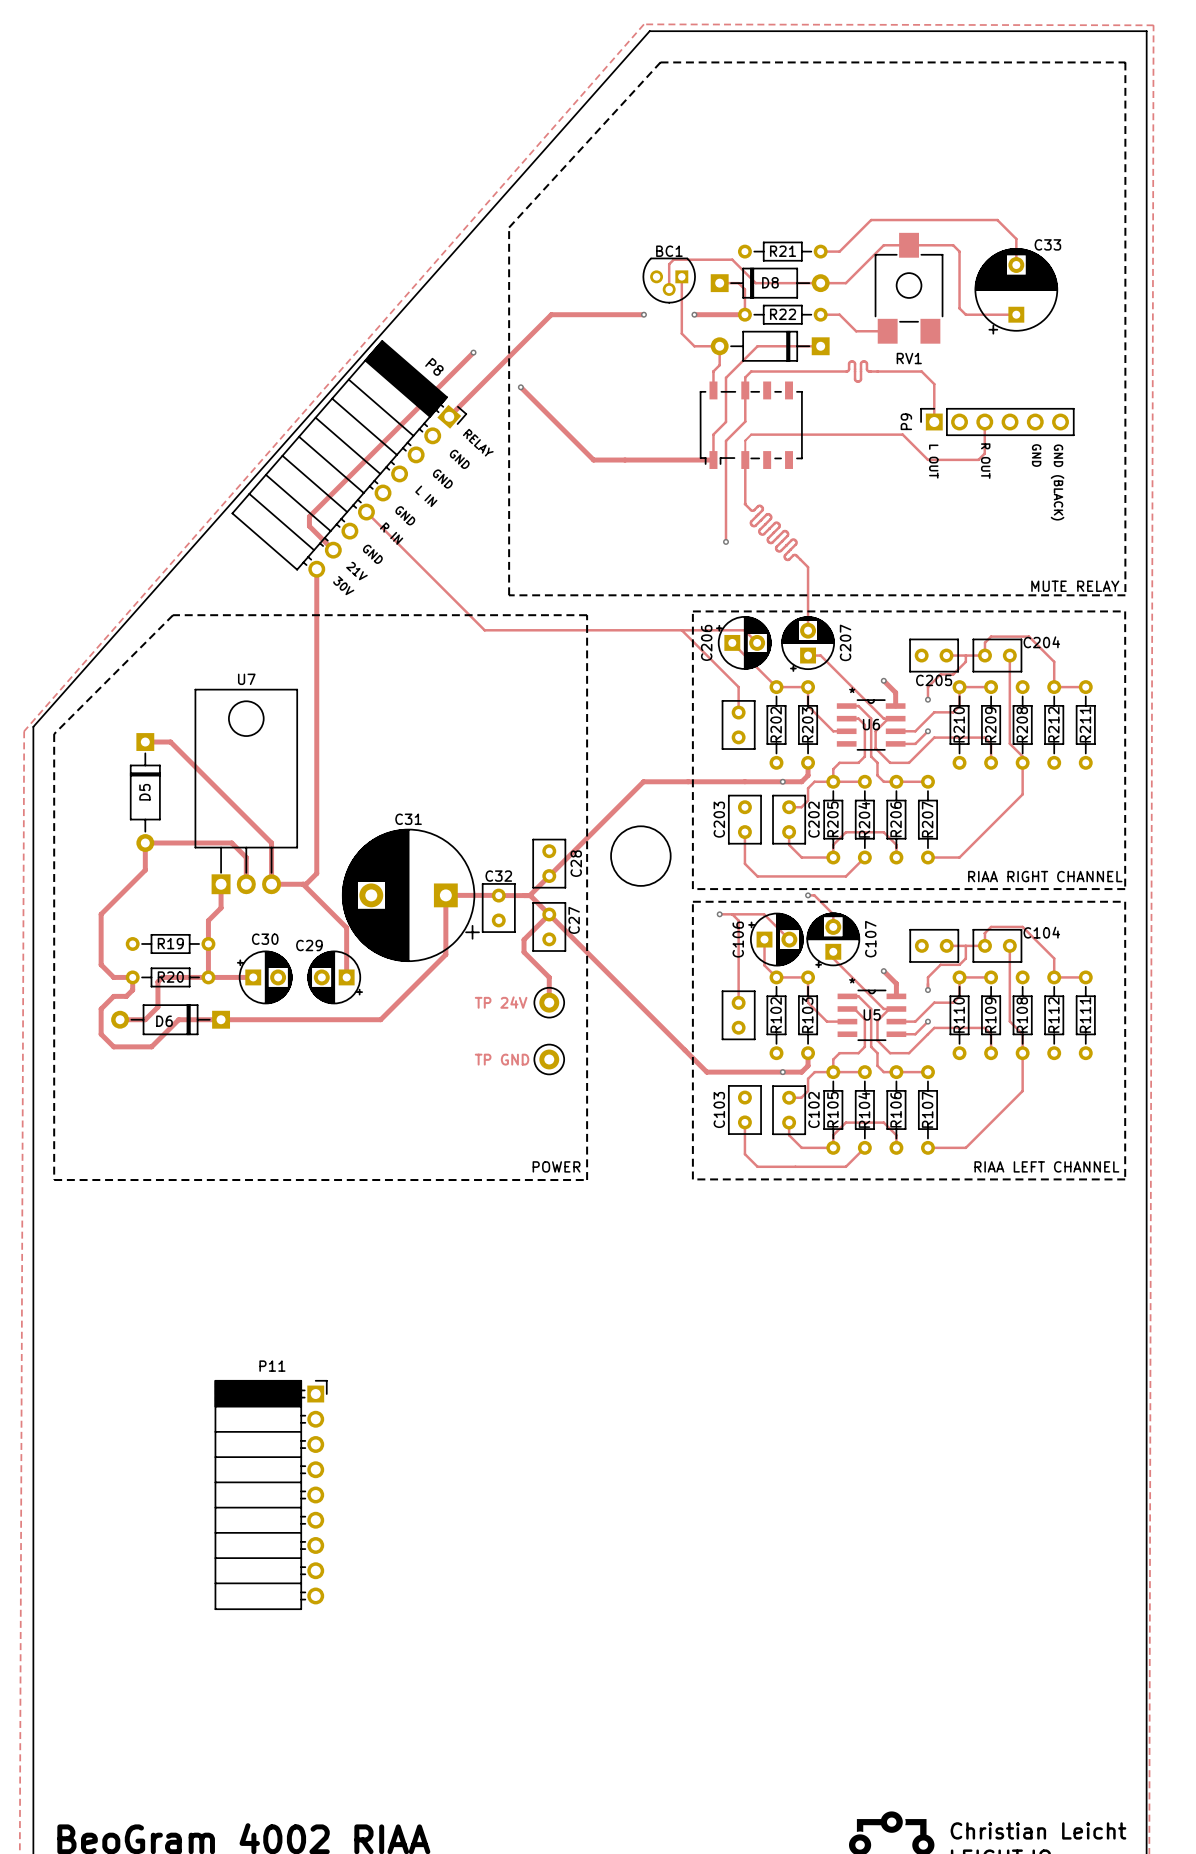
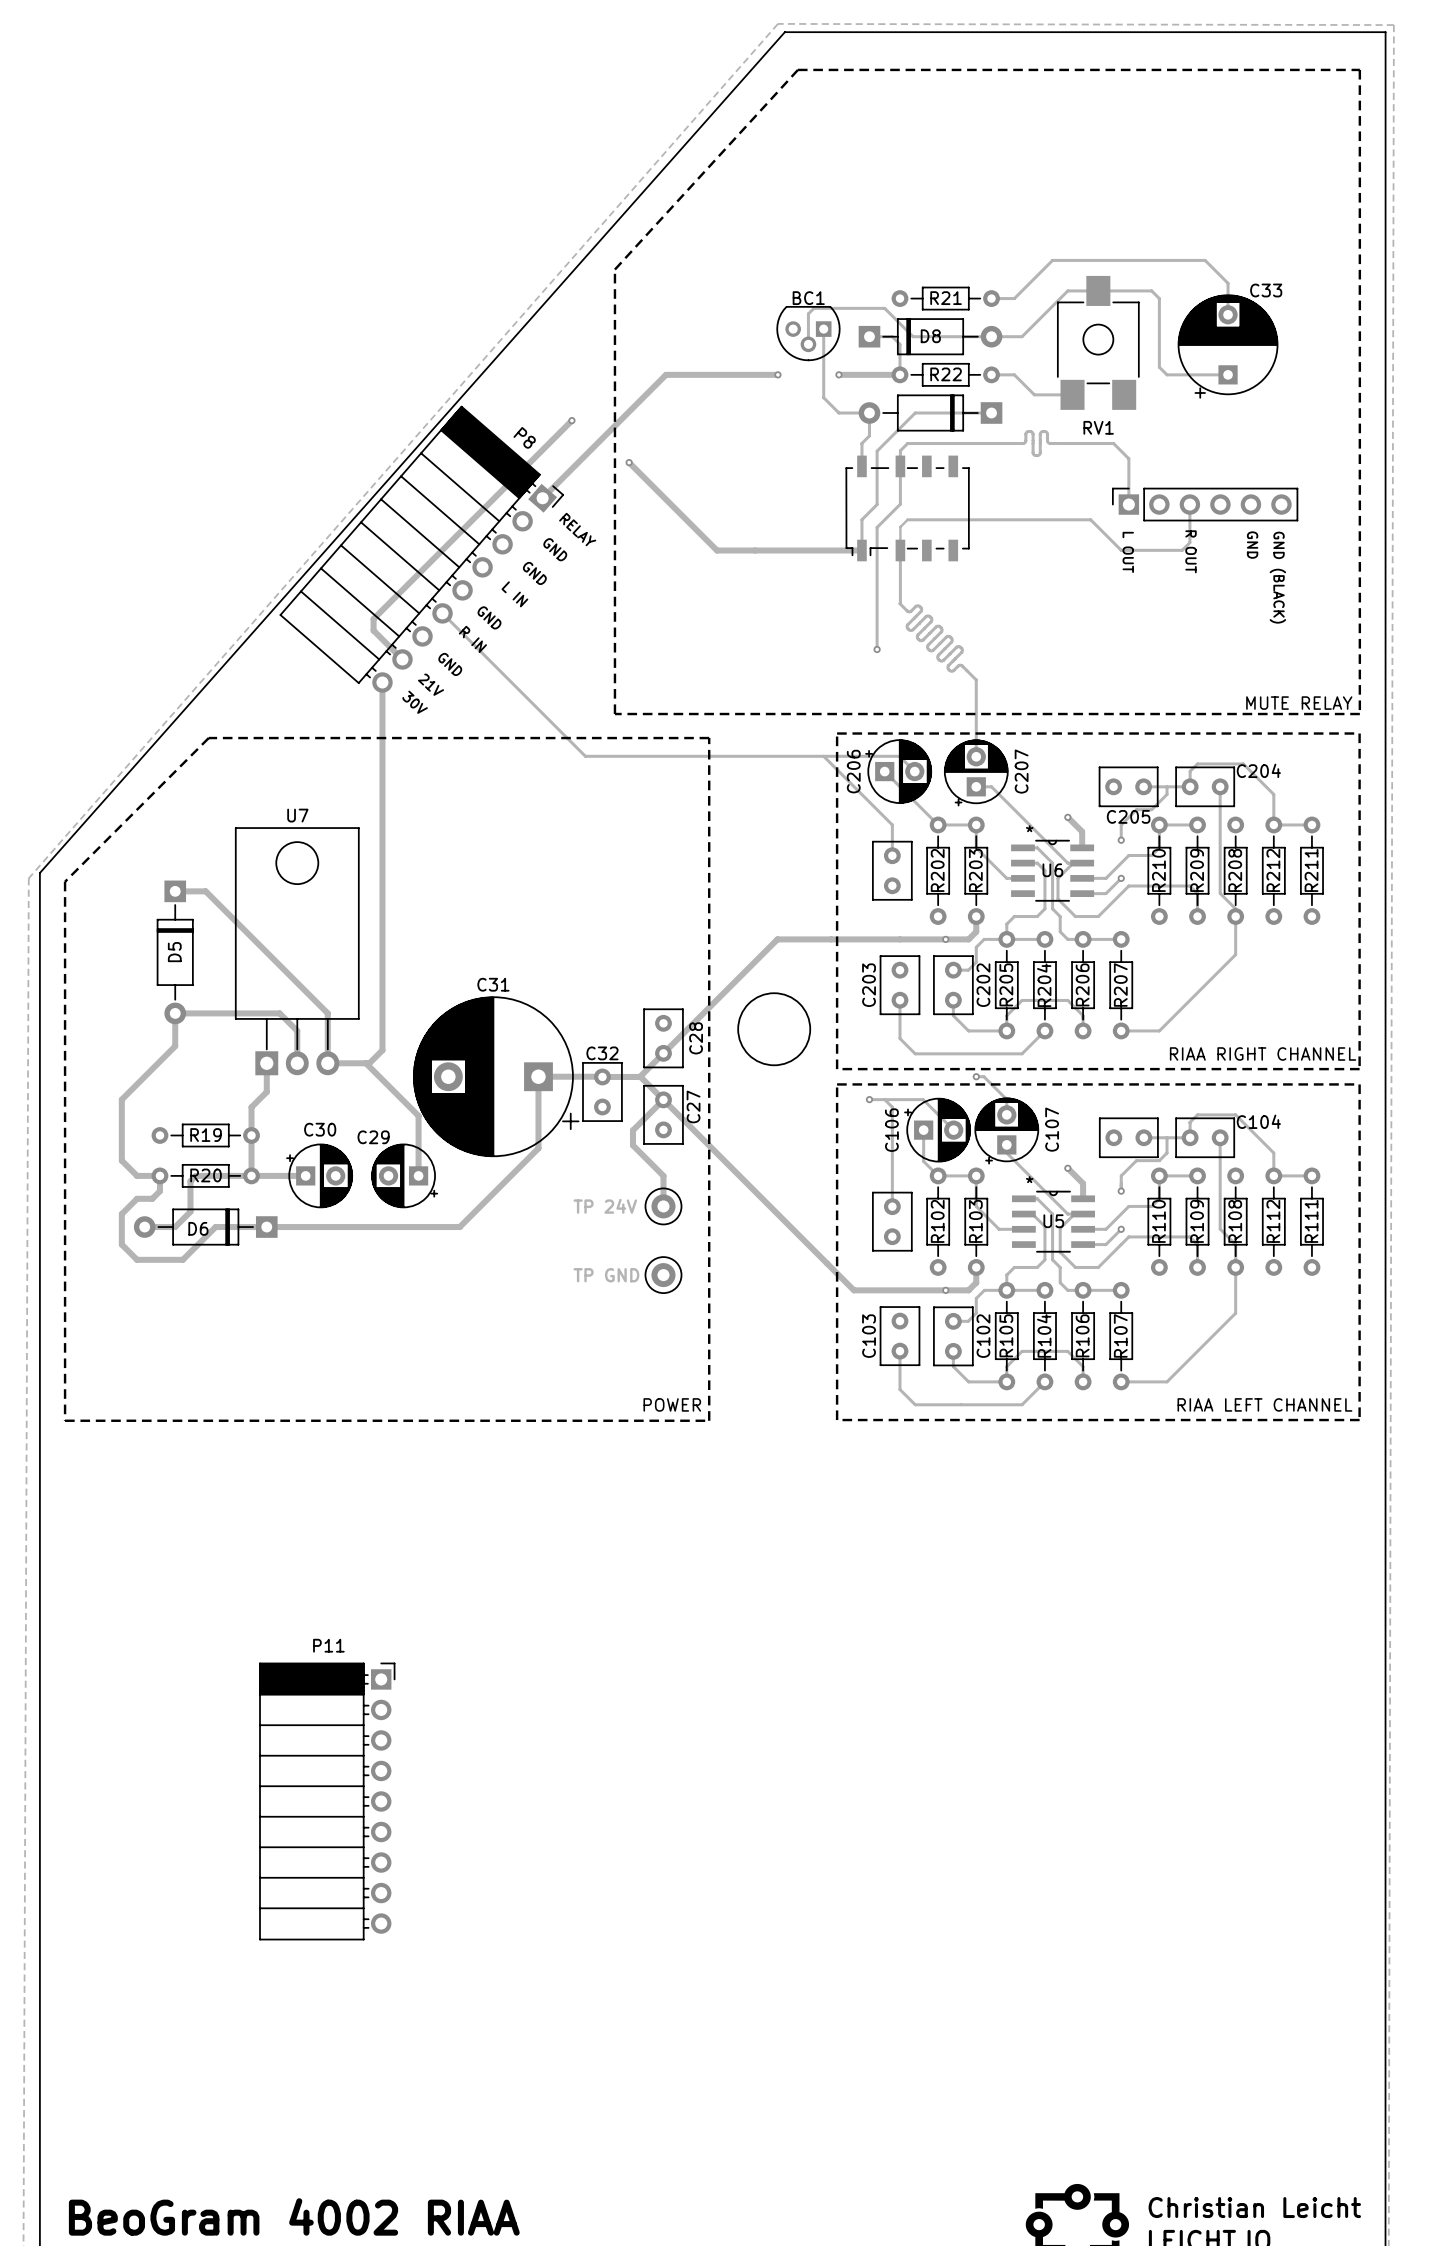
P9 name: P9 (906, 421) -> none

